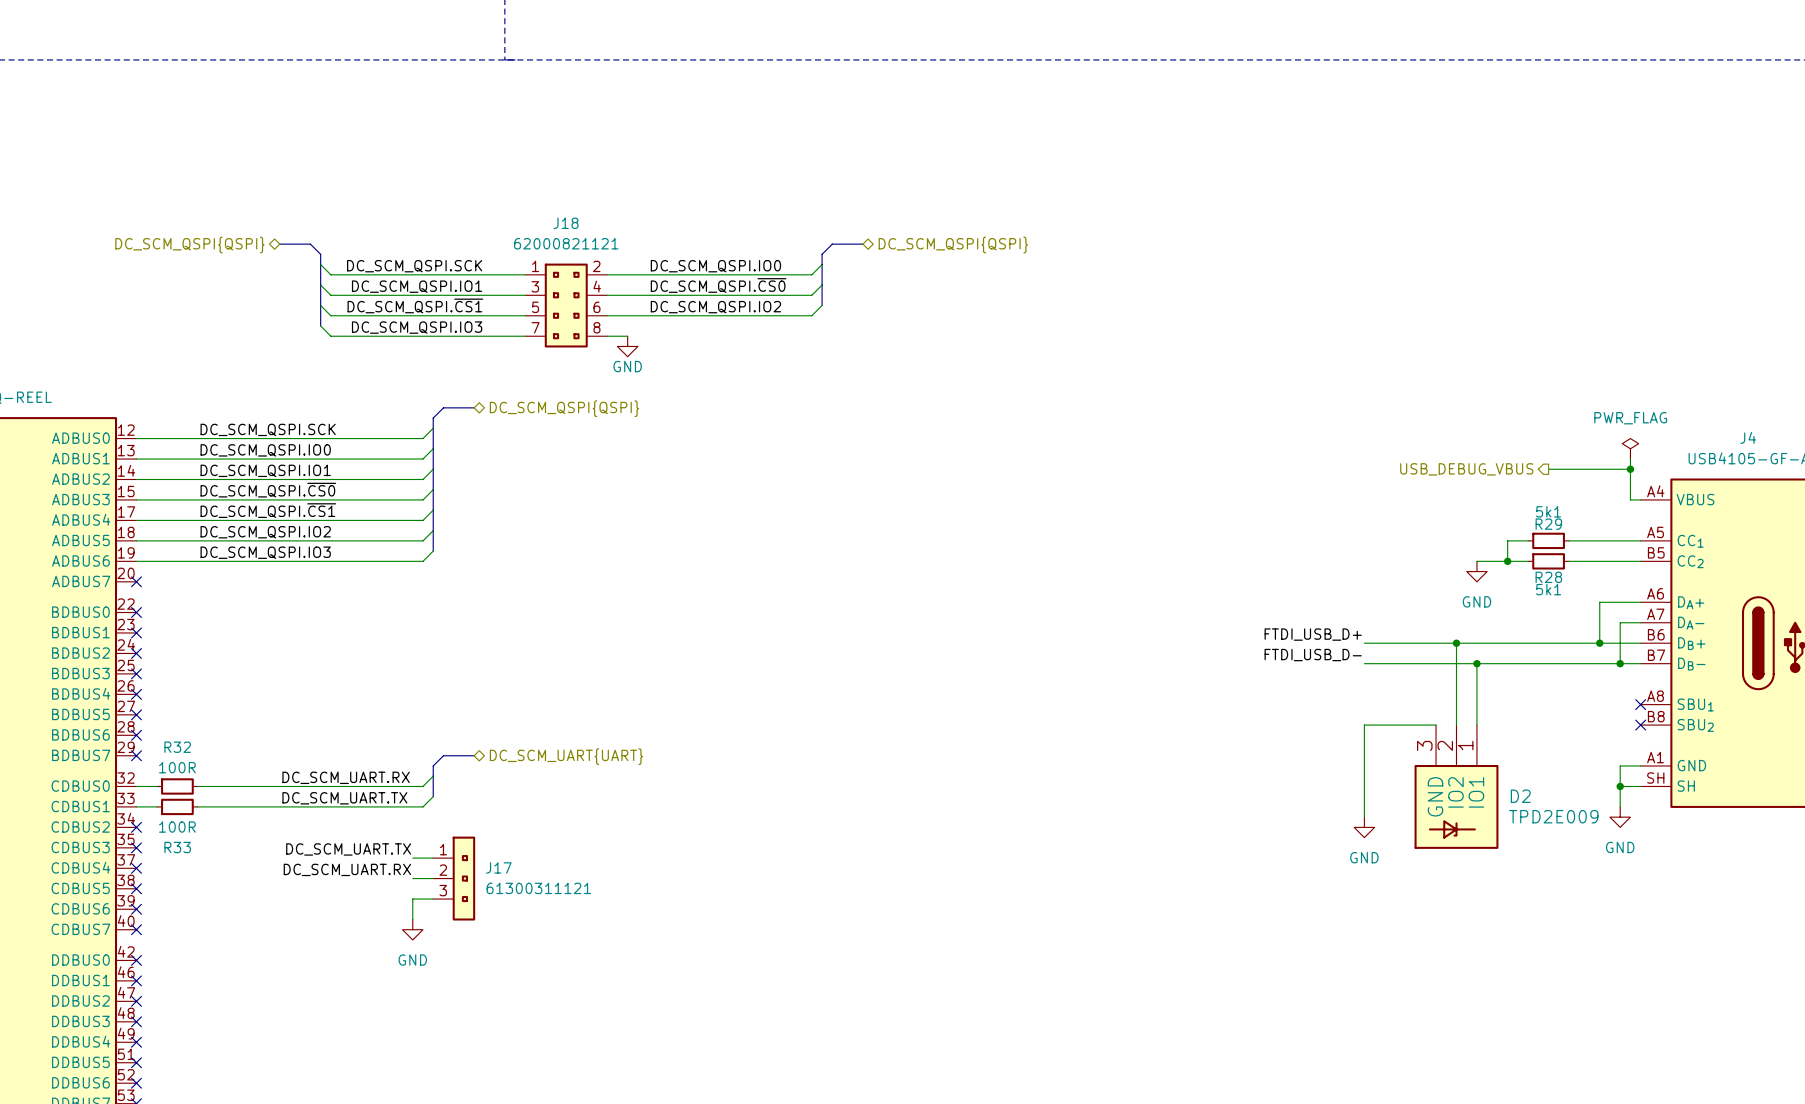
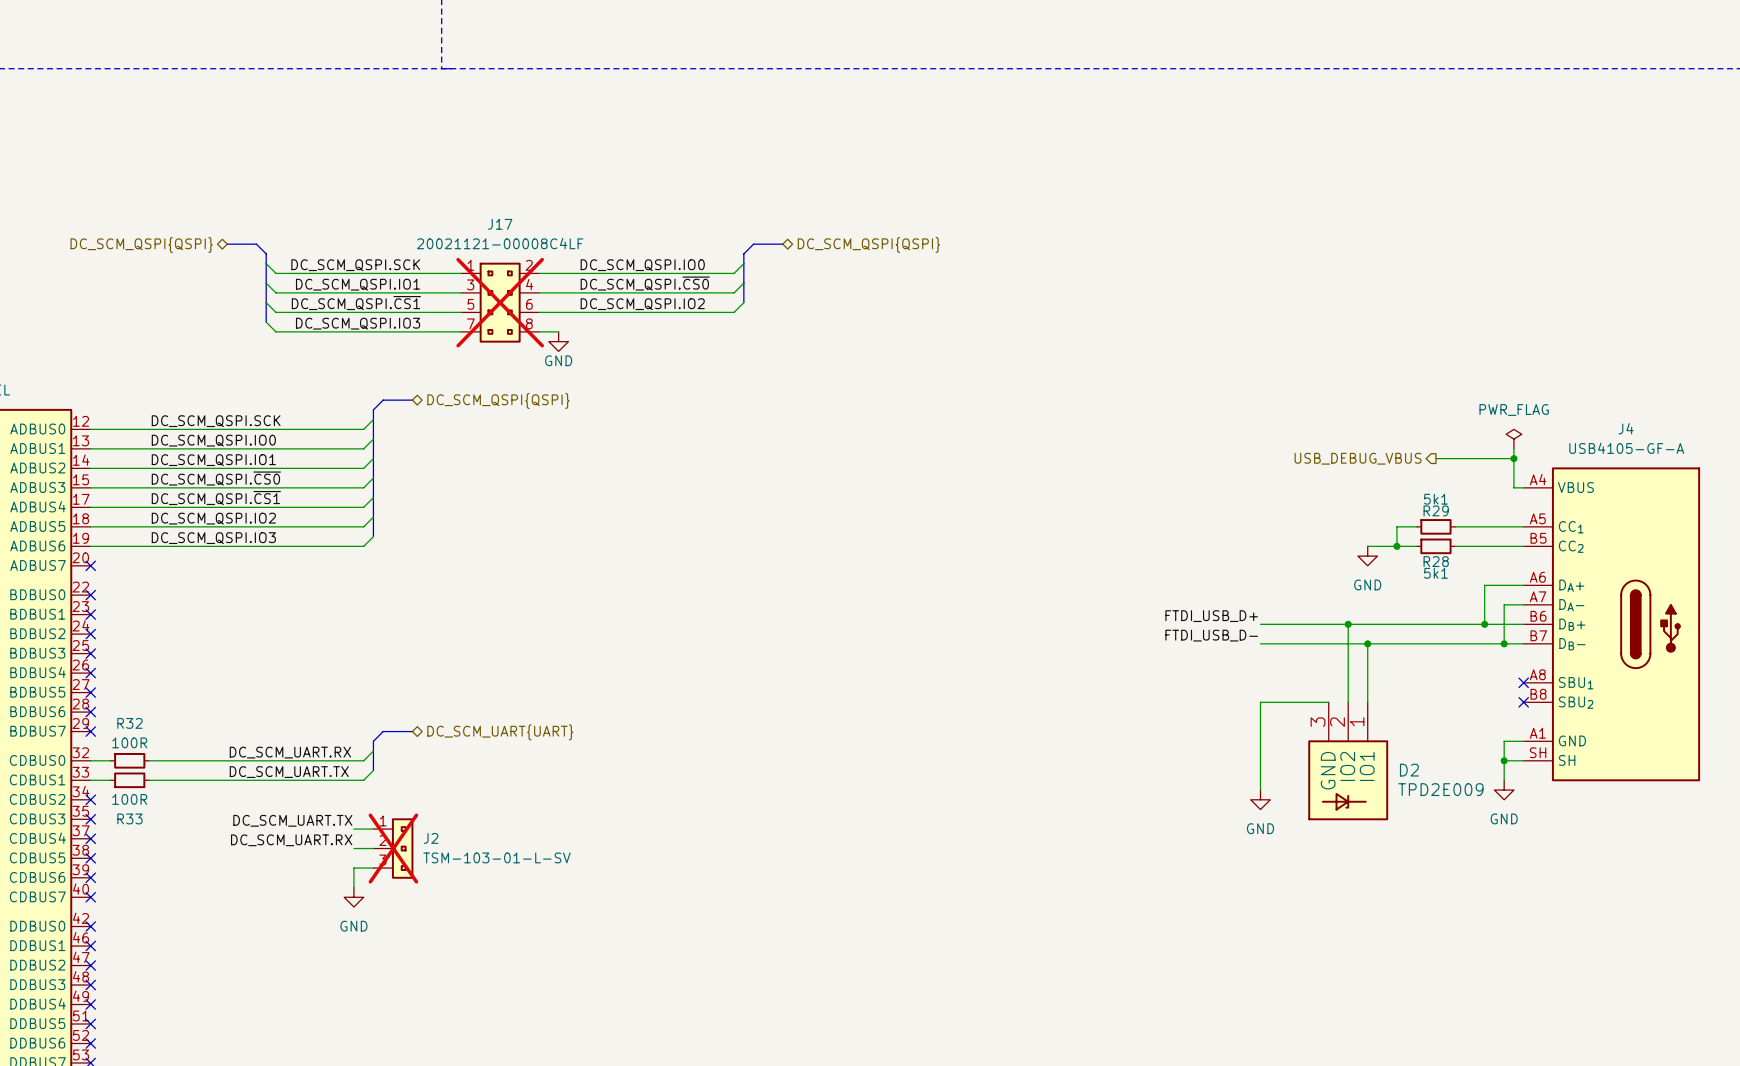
J18 name: J18 (566, 223) -> J17 (500, 224)
J18 text: 62000821121 (566, 243) -> 20021121-00008C4LF (500, 243)
J18 do-not-place cross: none -> (500, 302)
J17: (454, 878) -> none
J2: none -> (393, 848)

